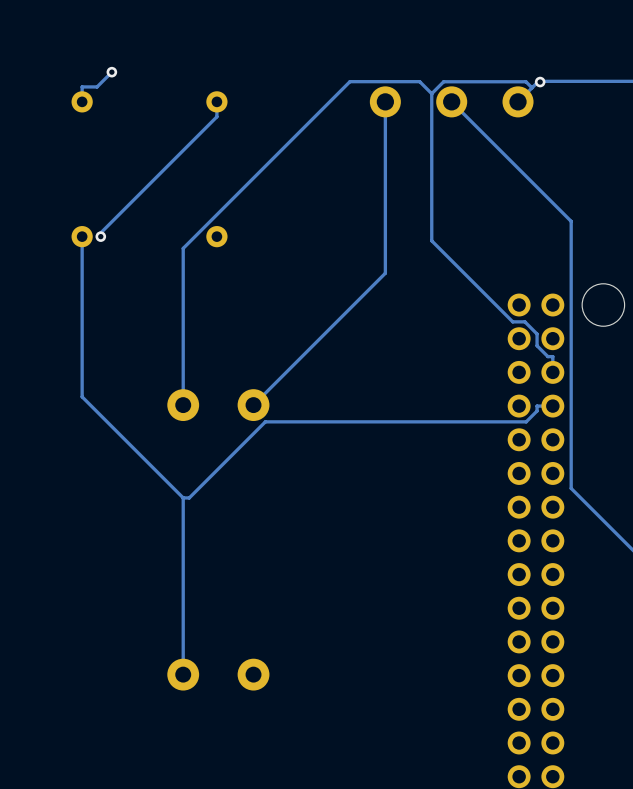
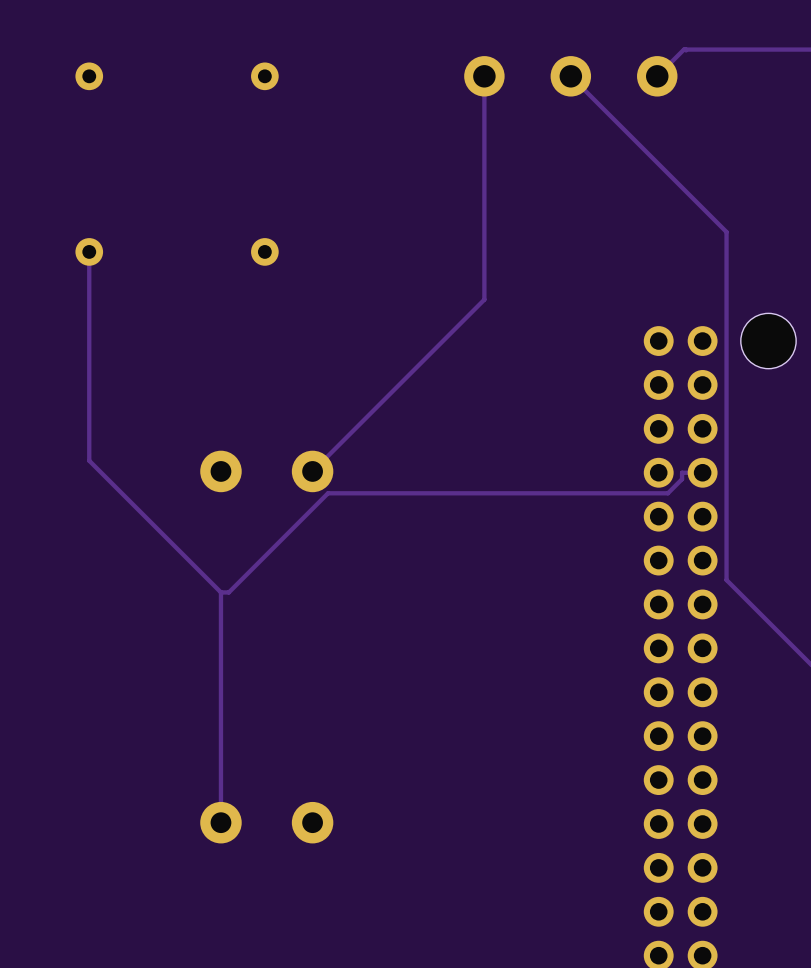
track: (111, 72) (97, 86) (82, 86) (82, 101) -> none
via: (111, 72) -> none
via: (540, 82) -> none
track: (532, 87) (525, 81) (443, 81) (431, 93) -> none
track: (431, 93) (431, 240) (512, 321) (524, 321) (537, 334) (537, 345) (547, 356) (552, 356) (552, 372) -> none
track: (431, 93) (419, 81) (349, 81) (183, 248) (183, 405) -> none
track: (216, 101) (216, 116) (100, 232) (100, 236) -> none
via: (100, 236) -> none

